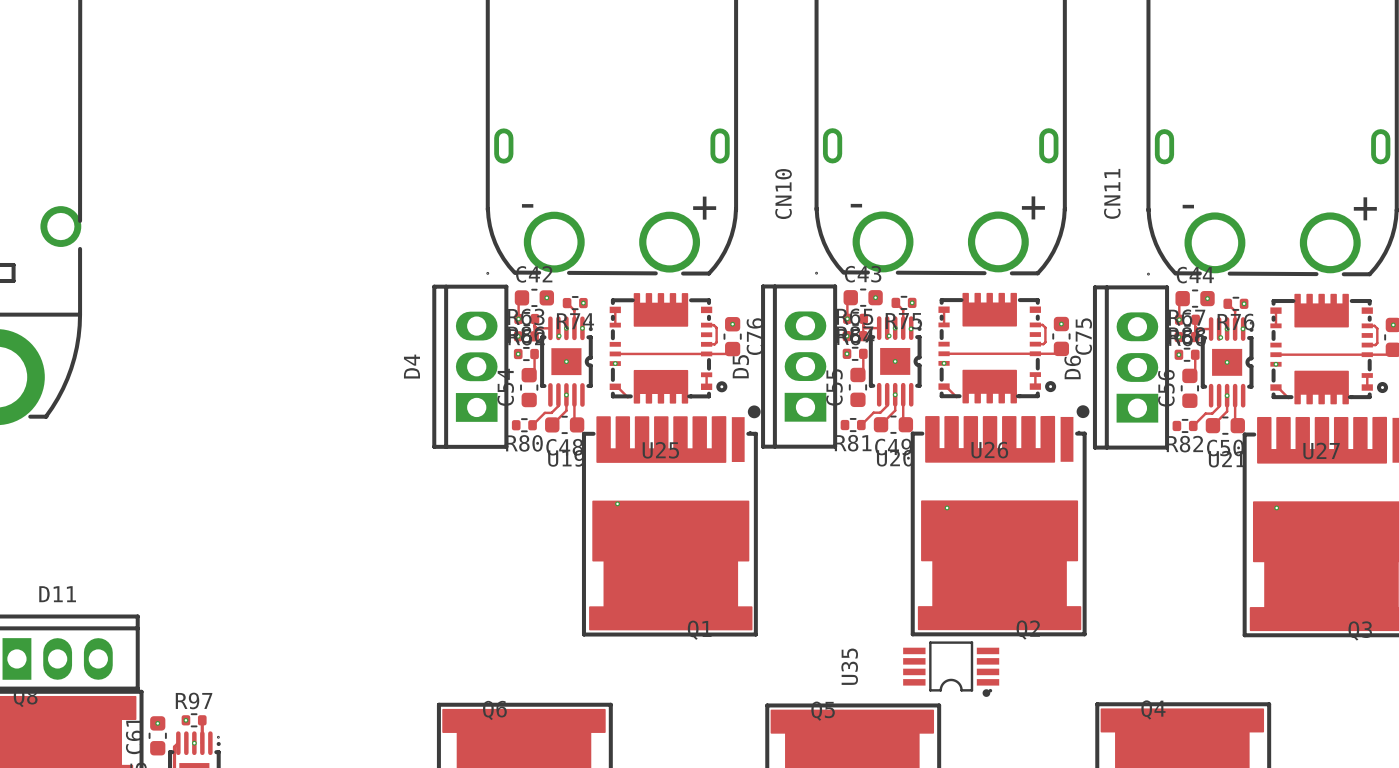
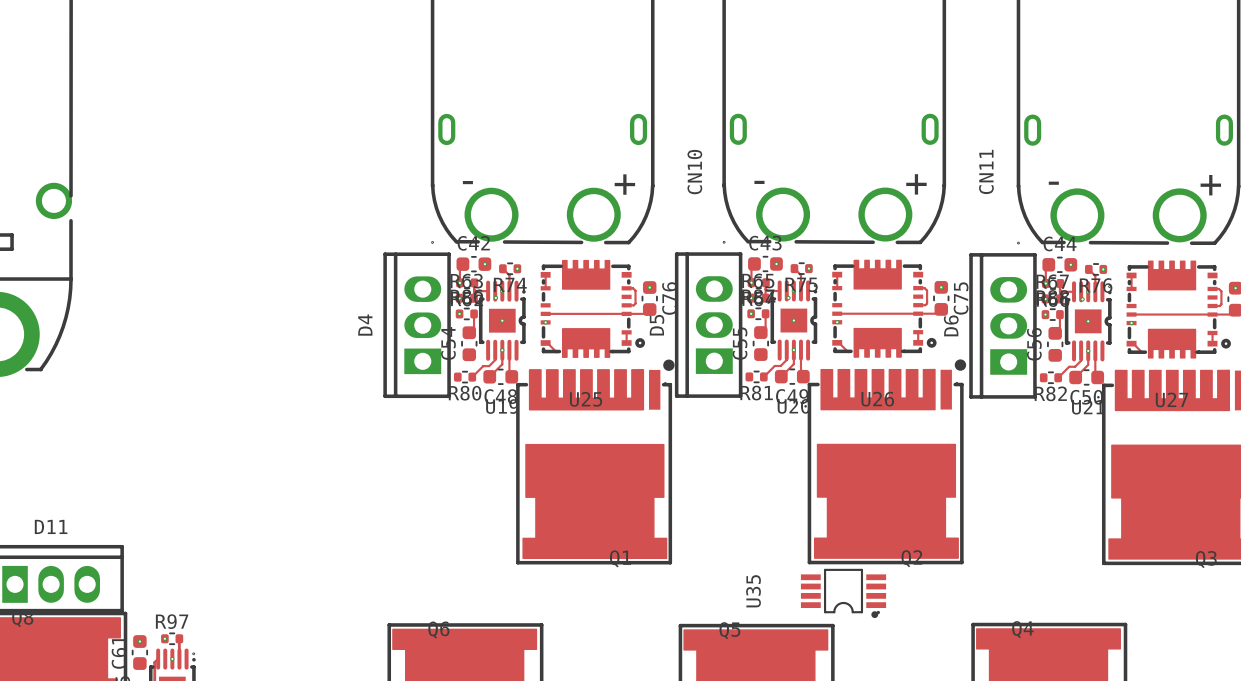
via: (582, 328) -> none
via: (911, 328) -> none
via: (1242, 328) -> none
via: (617, 503) -> none
via: (947, 507) -> none
via: (1276, 507) -> none

